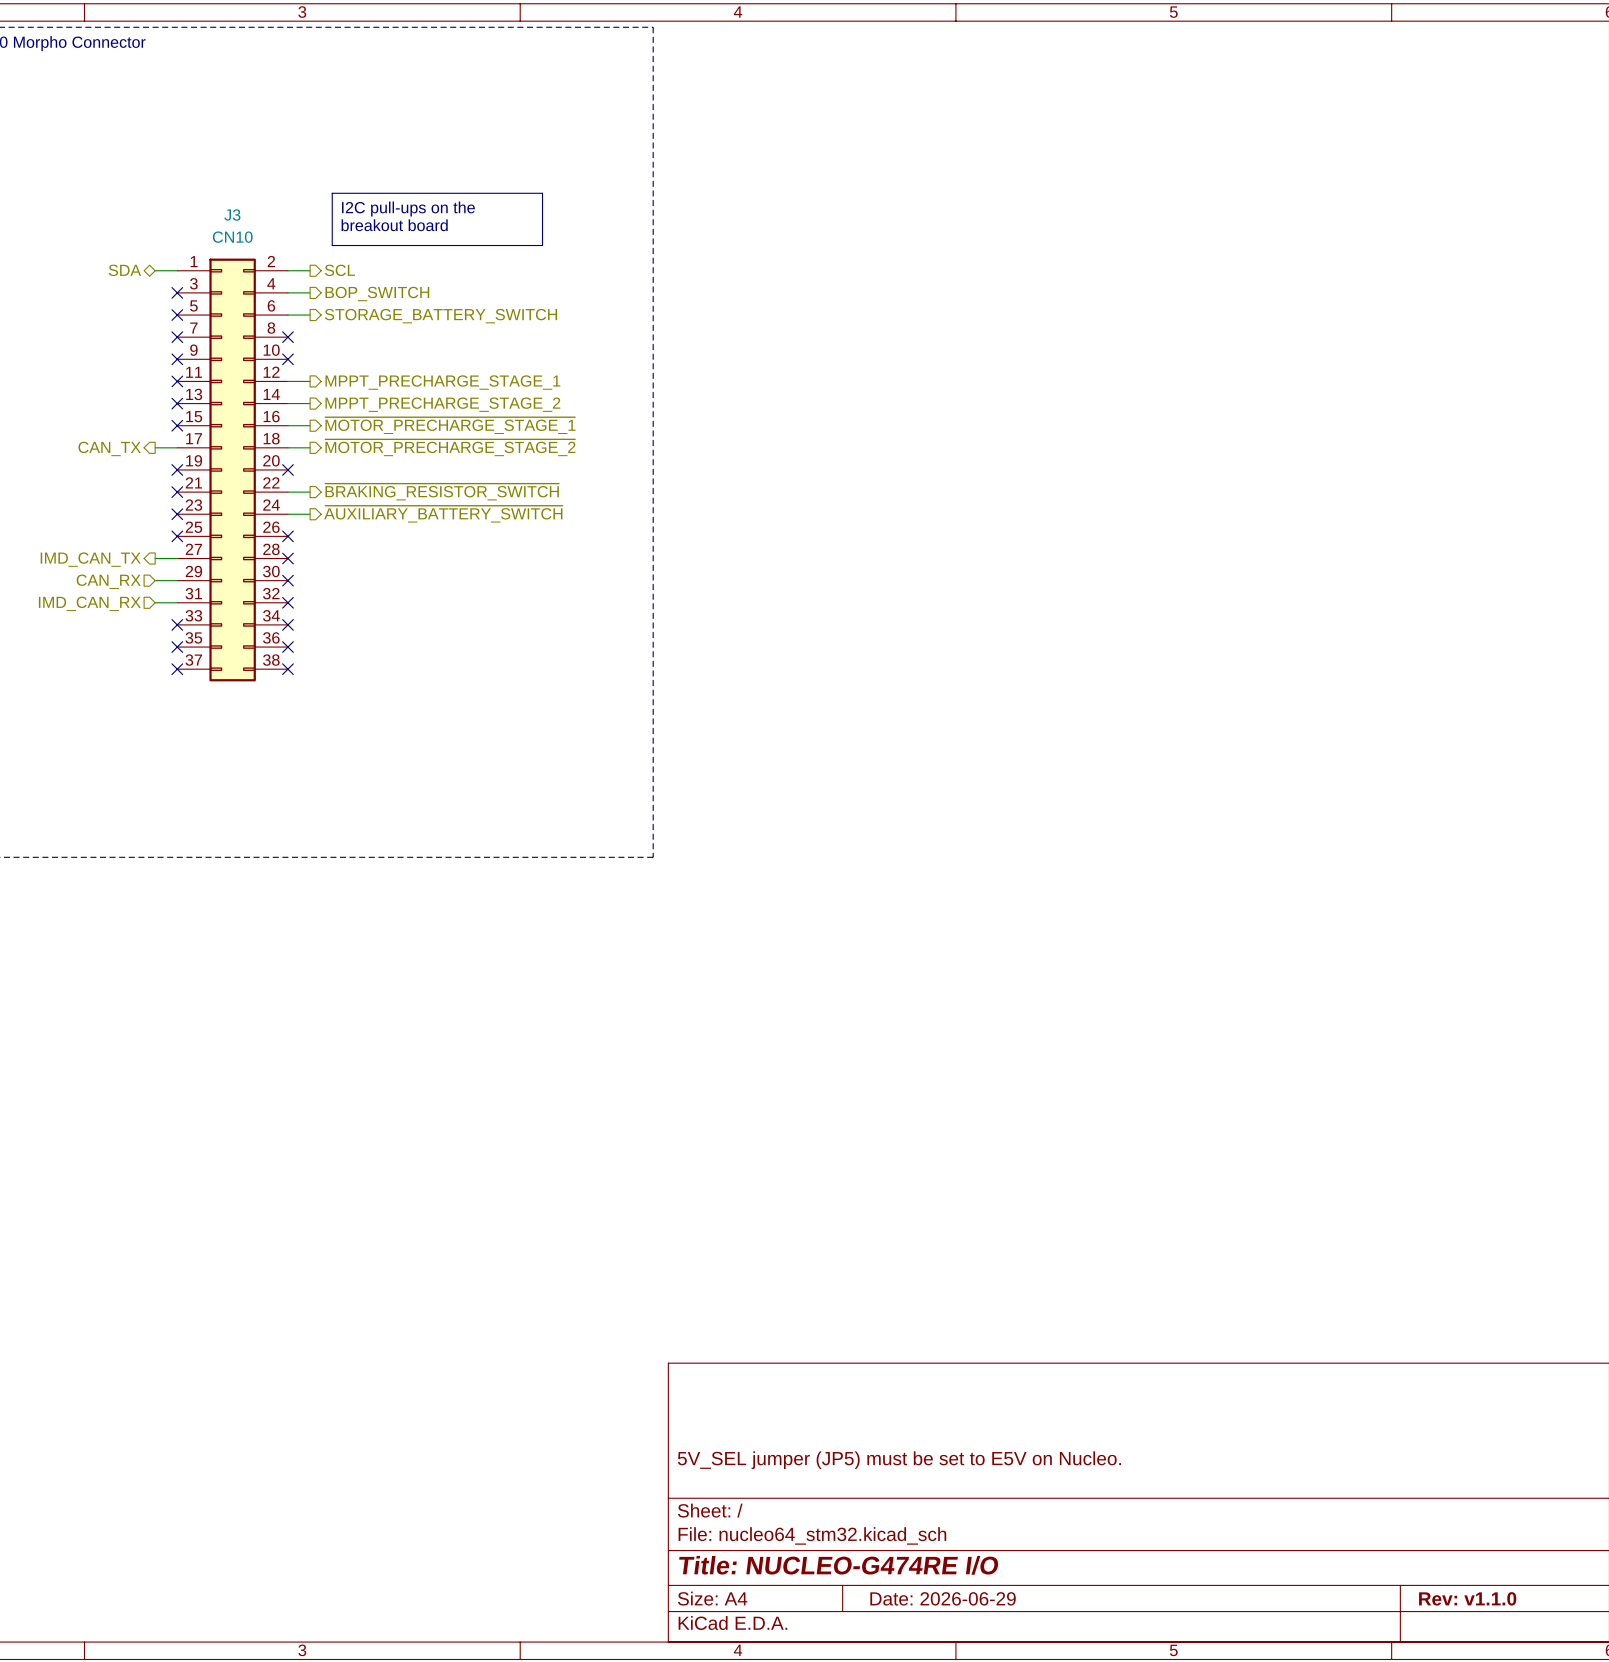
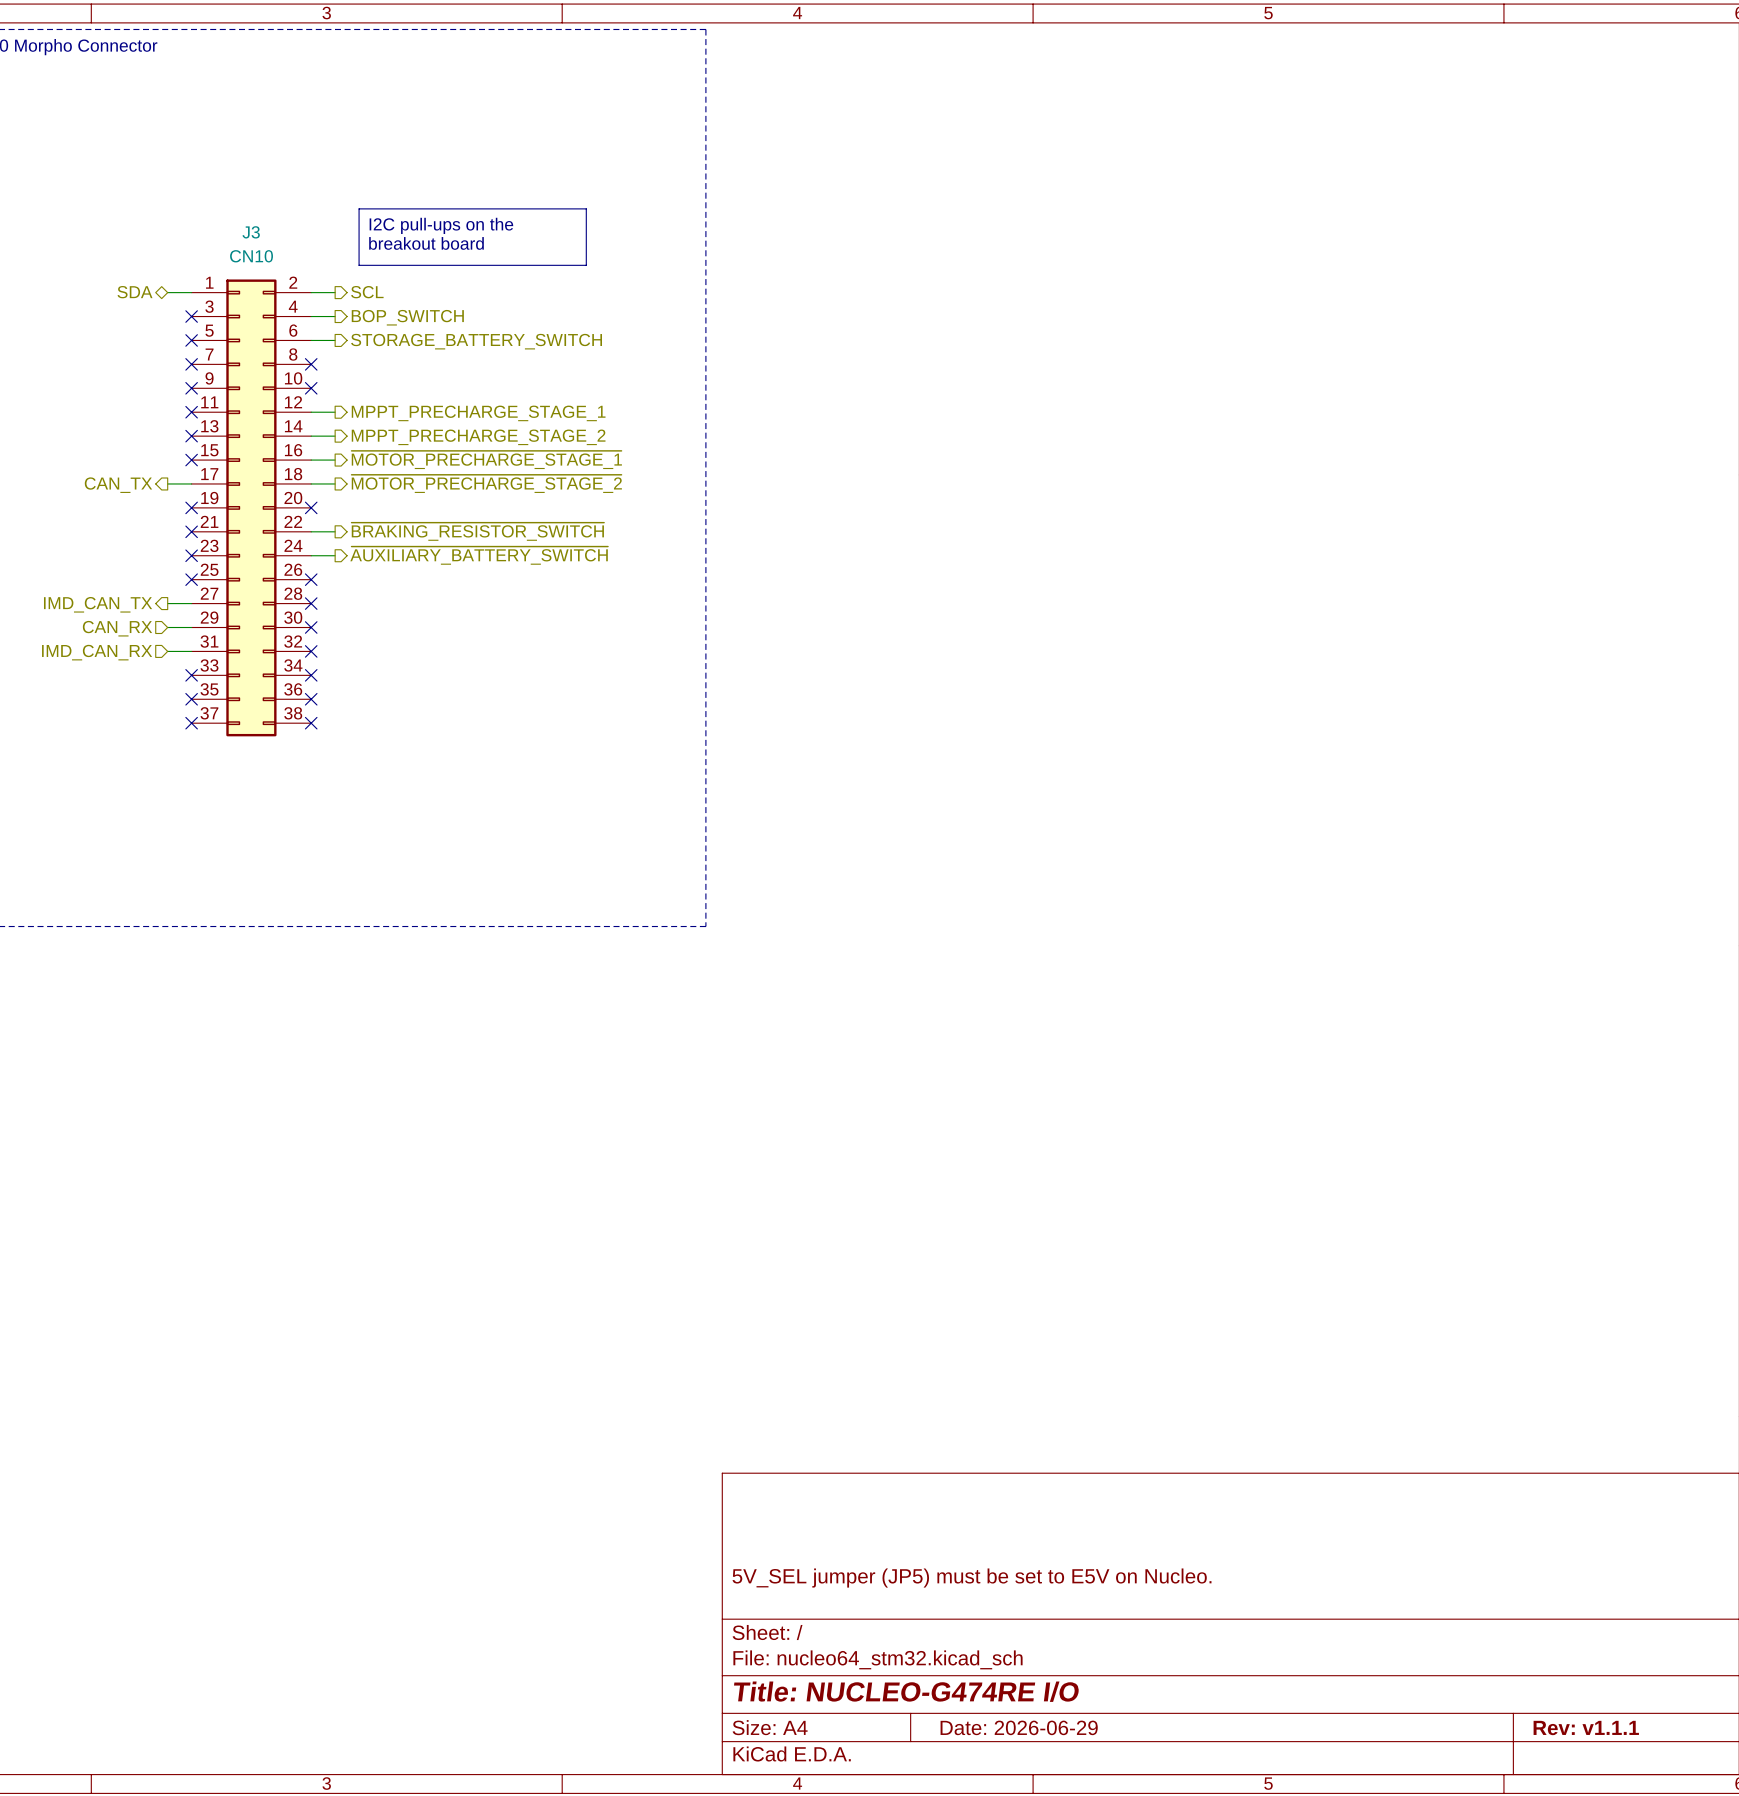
title block: Rev: v1.1.0 (1467, 1598) -> Rev: v1.1.1 (1586, 1728)

